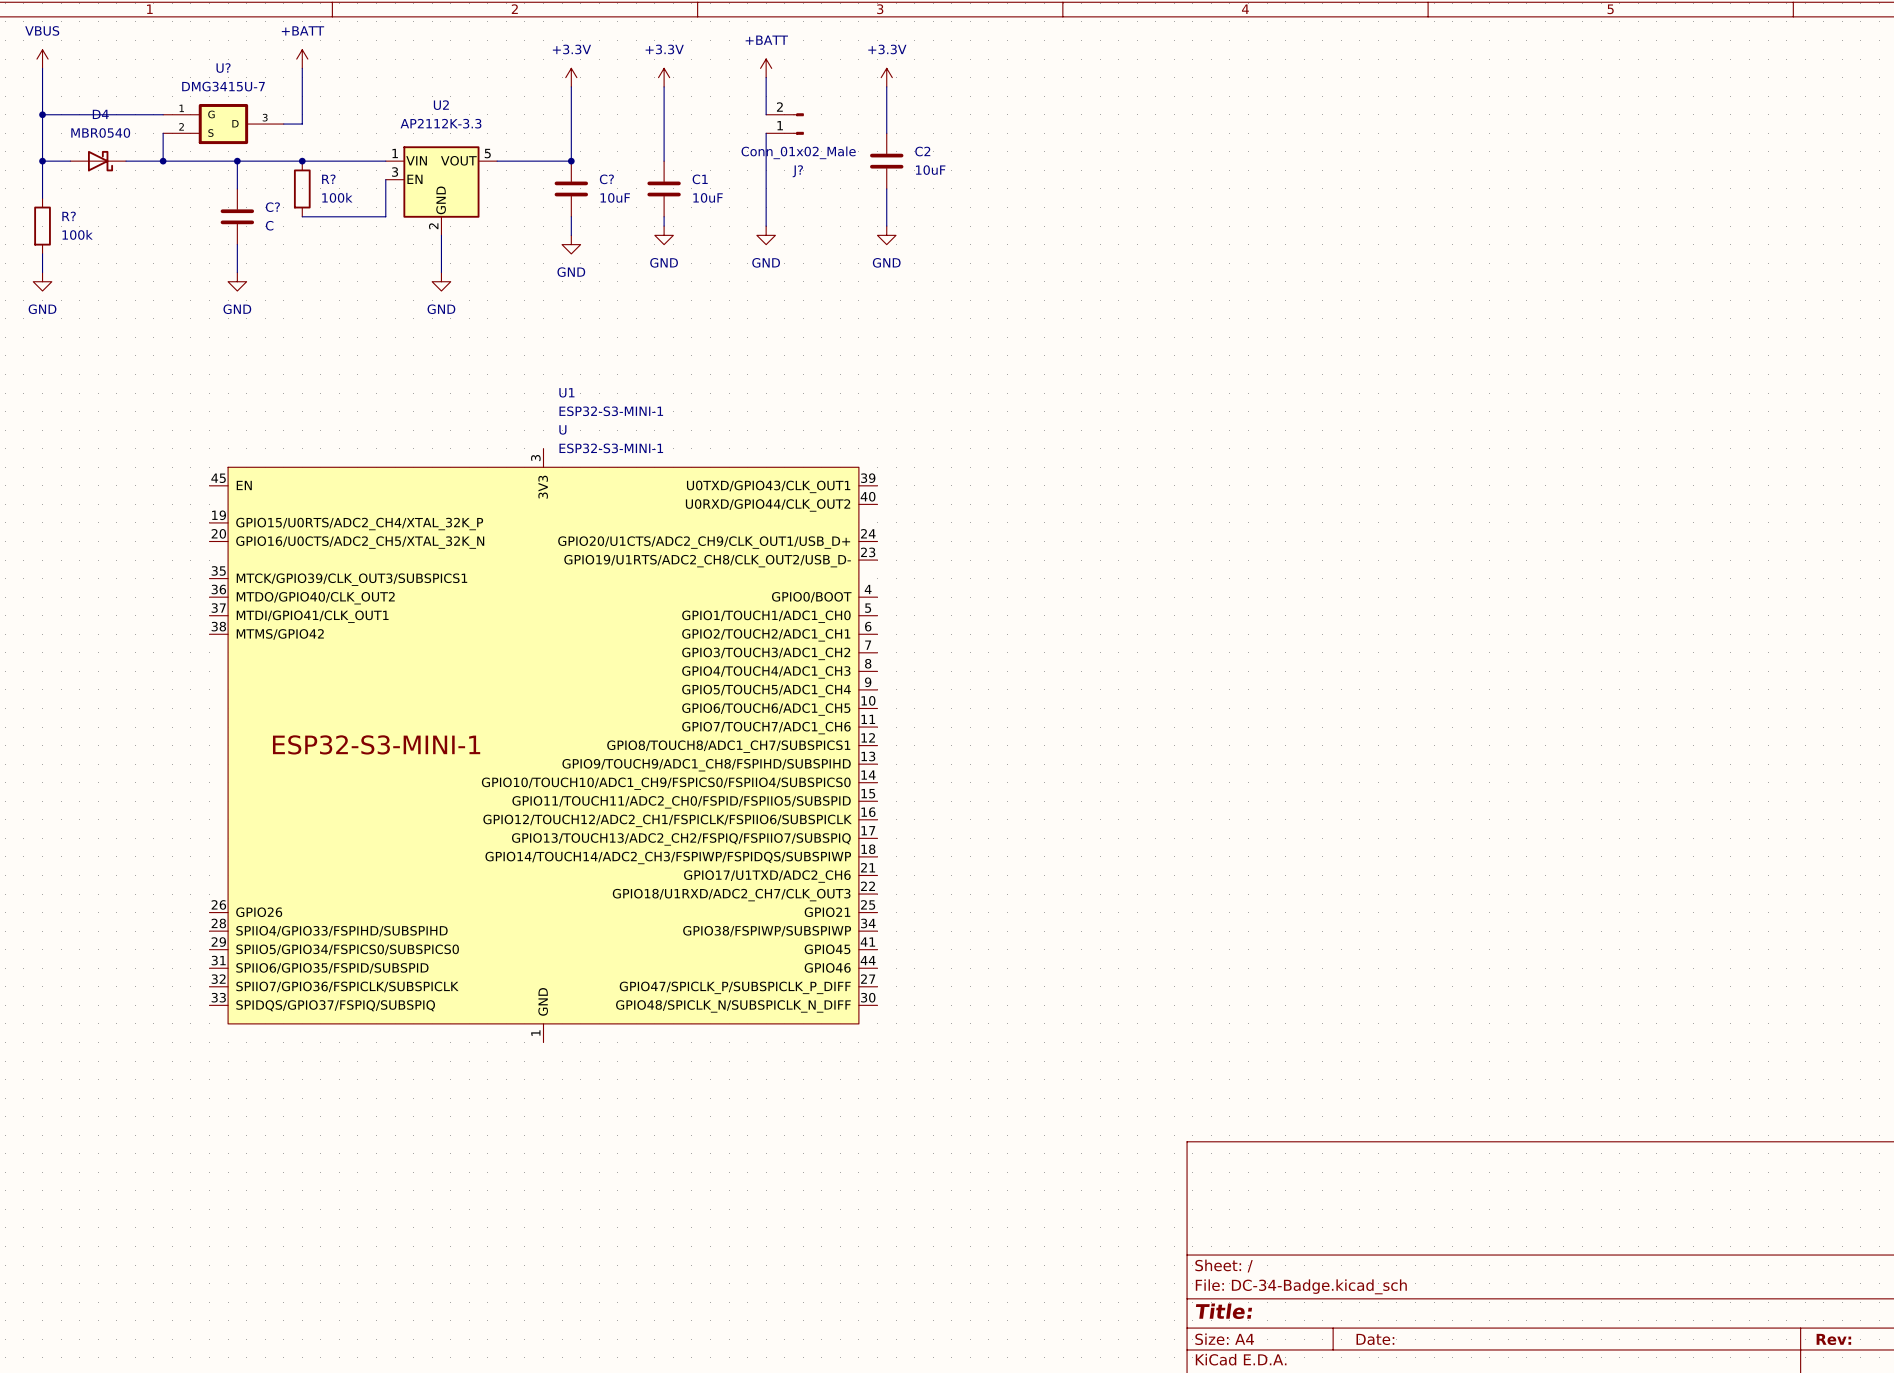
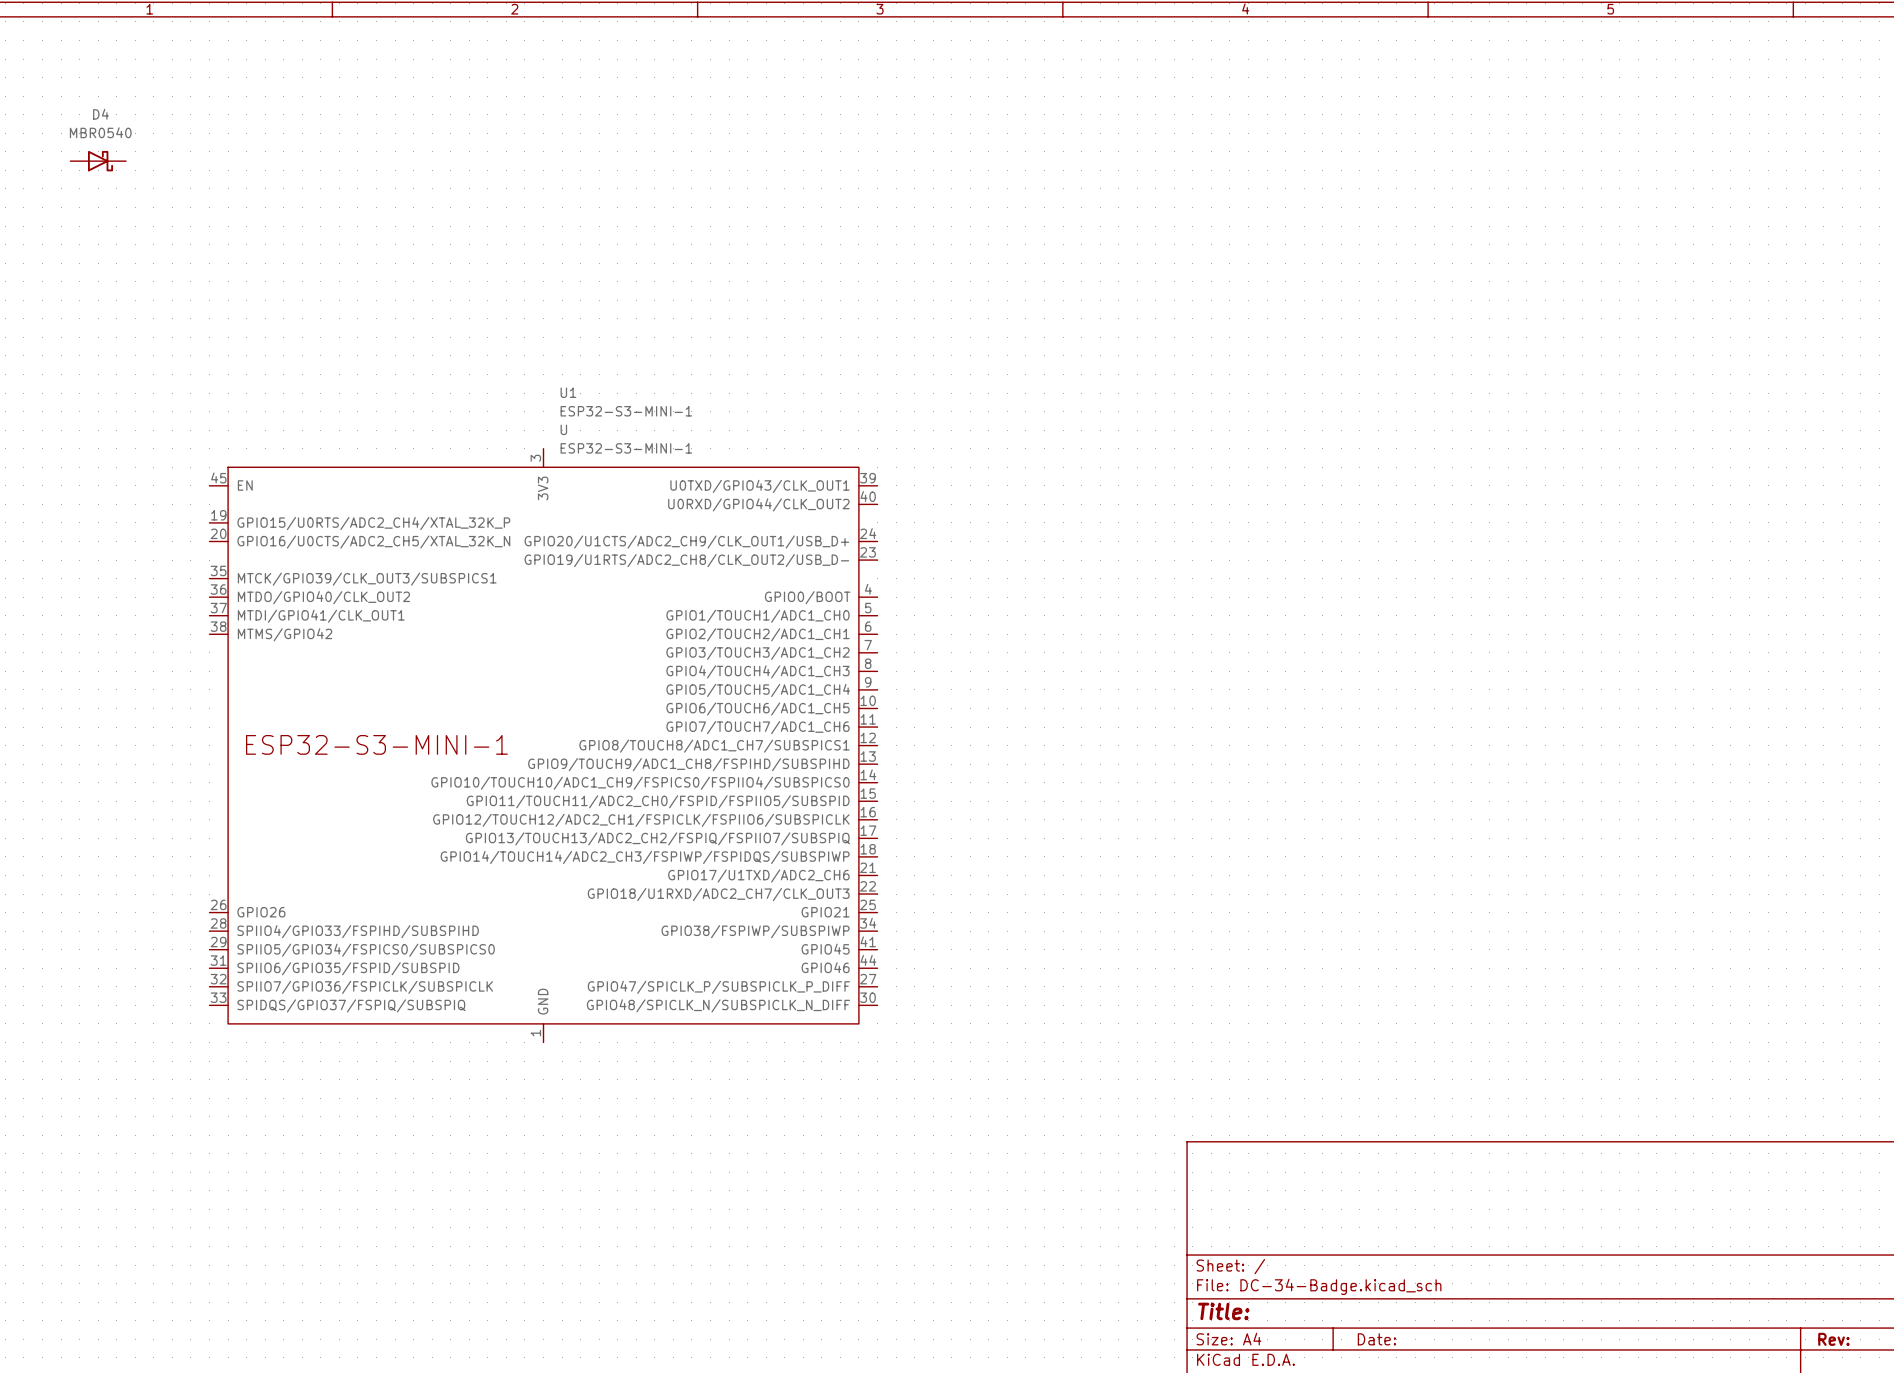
power symbol: VBUS (42, 59) -> none
power symbol: +BATT (302, 59) -> none
wire: (42, 68) (42, 198) -> none
wire: (302, 68) (302, 124) (283, 124) -> none
power symbol: +BATT (766, 68) -> none
power symbol: +3.3V (571, 77) -> none
power symbol: +3.3V (664, 77) -> none
wire: (766, 77) (766, 114) -> none
power symbol: +3.3V (886, 77) -> none
wire: (571, 86) (571, 161) (497, 161) -> none
wire: (664, 86) (664, 161) -> none
wire: (886, 86) (886, 133) -> none
wire: (42, 114) (163, 114) -> none
junction: (42, 114) -> none
U?: DMG3415U-7 (223, 124) -> none
J?: Conn_01x02_Male (784, 124) -> none
wire: (163, 133) (163, 161) -> none
wire: (766, 133) (766, 226) -> none
wire: (42, 161) (70, 161) -> none
junction: (42, 161) -> none
wire: (126, 161) (385, 161) -> none
junction: (163, 161) -> none
wire: (237, 161) (237, 188) -> none
junction: (237, 161) -> none
junction: (302, 161) -> none
junction: (571, 161) -> none
C2: 10uF (886, 161) -> none
wire: (385, 179) (385, 216) (302, 216) -> none
R?: 100k (302, 188) -> none
C?: 10uF (571, 188) -> none
C1: 10uF (664, 188) -> none
wire: (886, 188) (886, 226) -> none
U2: AP2112K-3.3 (441, 190) -> none
C?: C (237, 216) -> none
wire: (571, 216) (571, 235) -> none
wire: (664, 216) (664, 226) -> none
R?: 100k (42, 226) -> none
wire: (441, 235) (441, 272) -> none
power symbol: GND (664, 235) -> none
power symbol: GND (766, 235) -> none
power symbol: GND (886, 235) -> none
wire: (237, 244) (237, 272) -> none
power symbol: GND (571, 244) -> none
wire: (42, 253) (42, 272) -> none
power symbol: GND (42, 281) -> none
power symbol: GND (237, 281) -> none
power symbol: GND (441, 281) -> none

